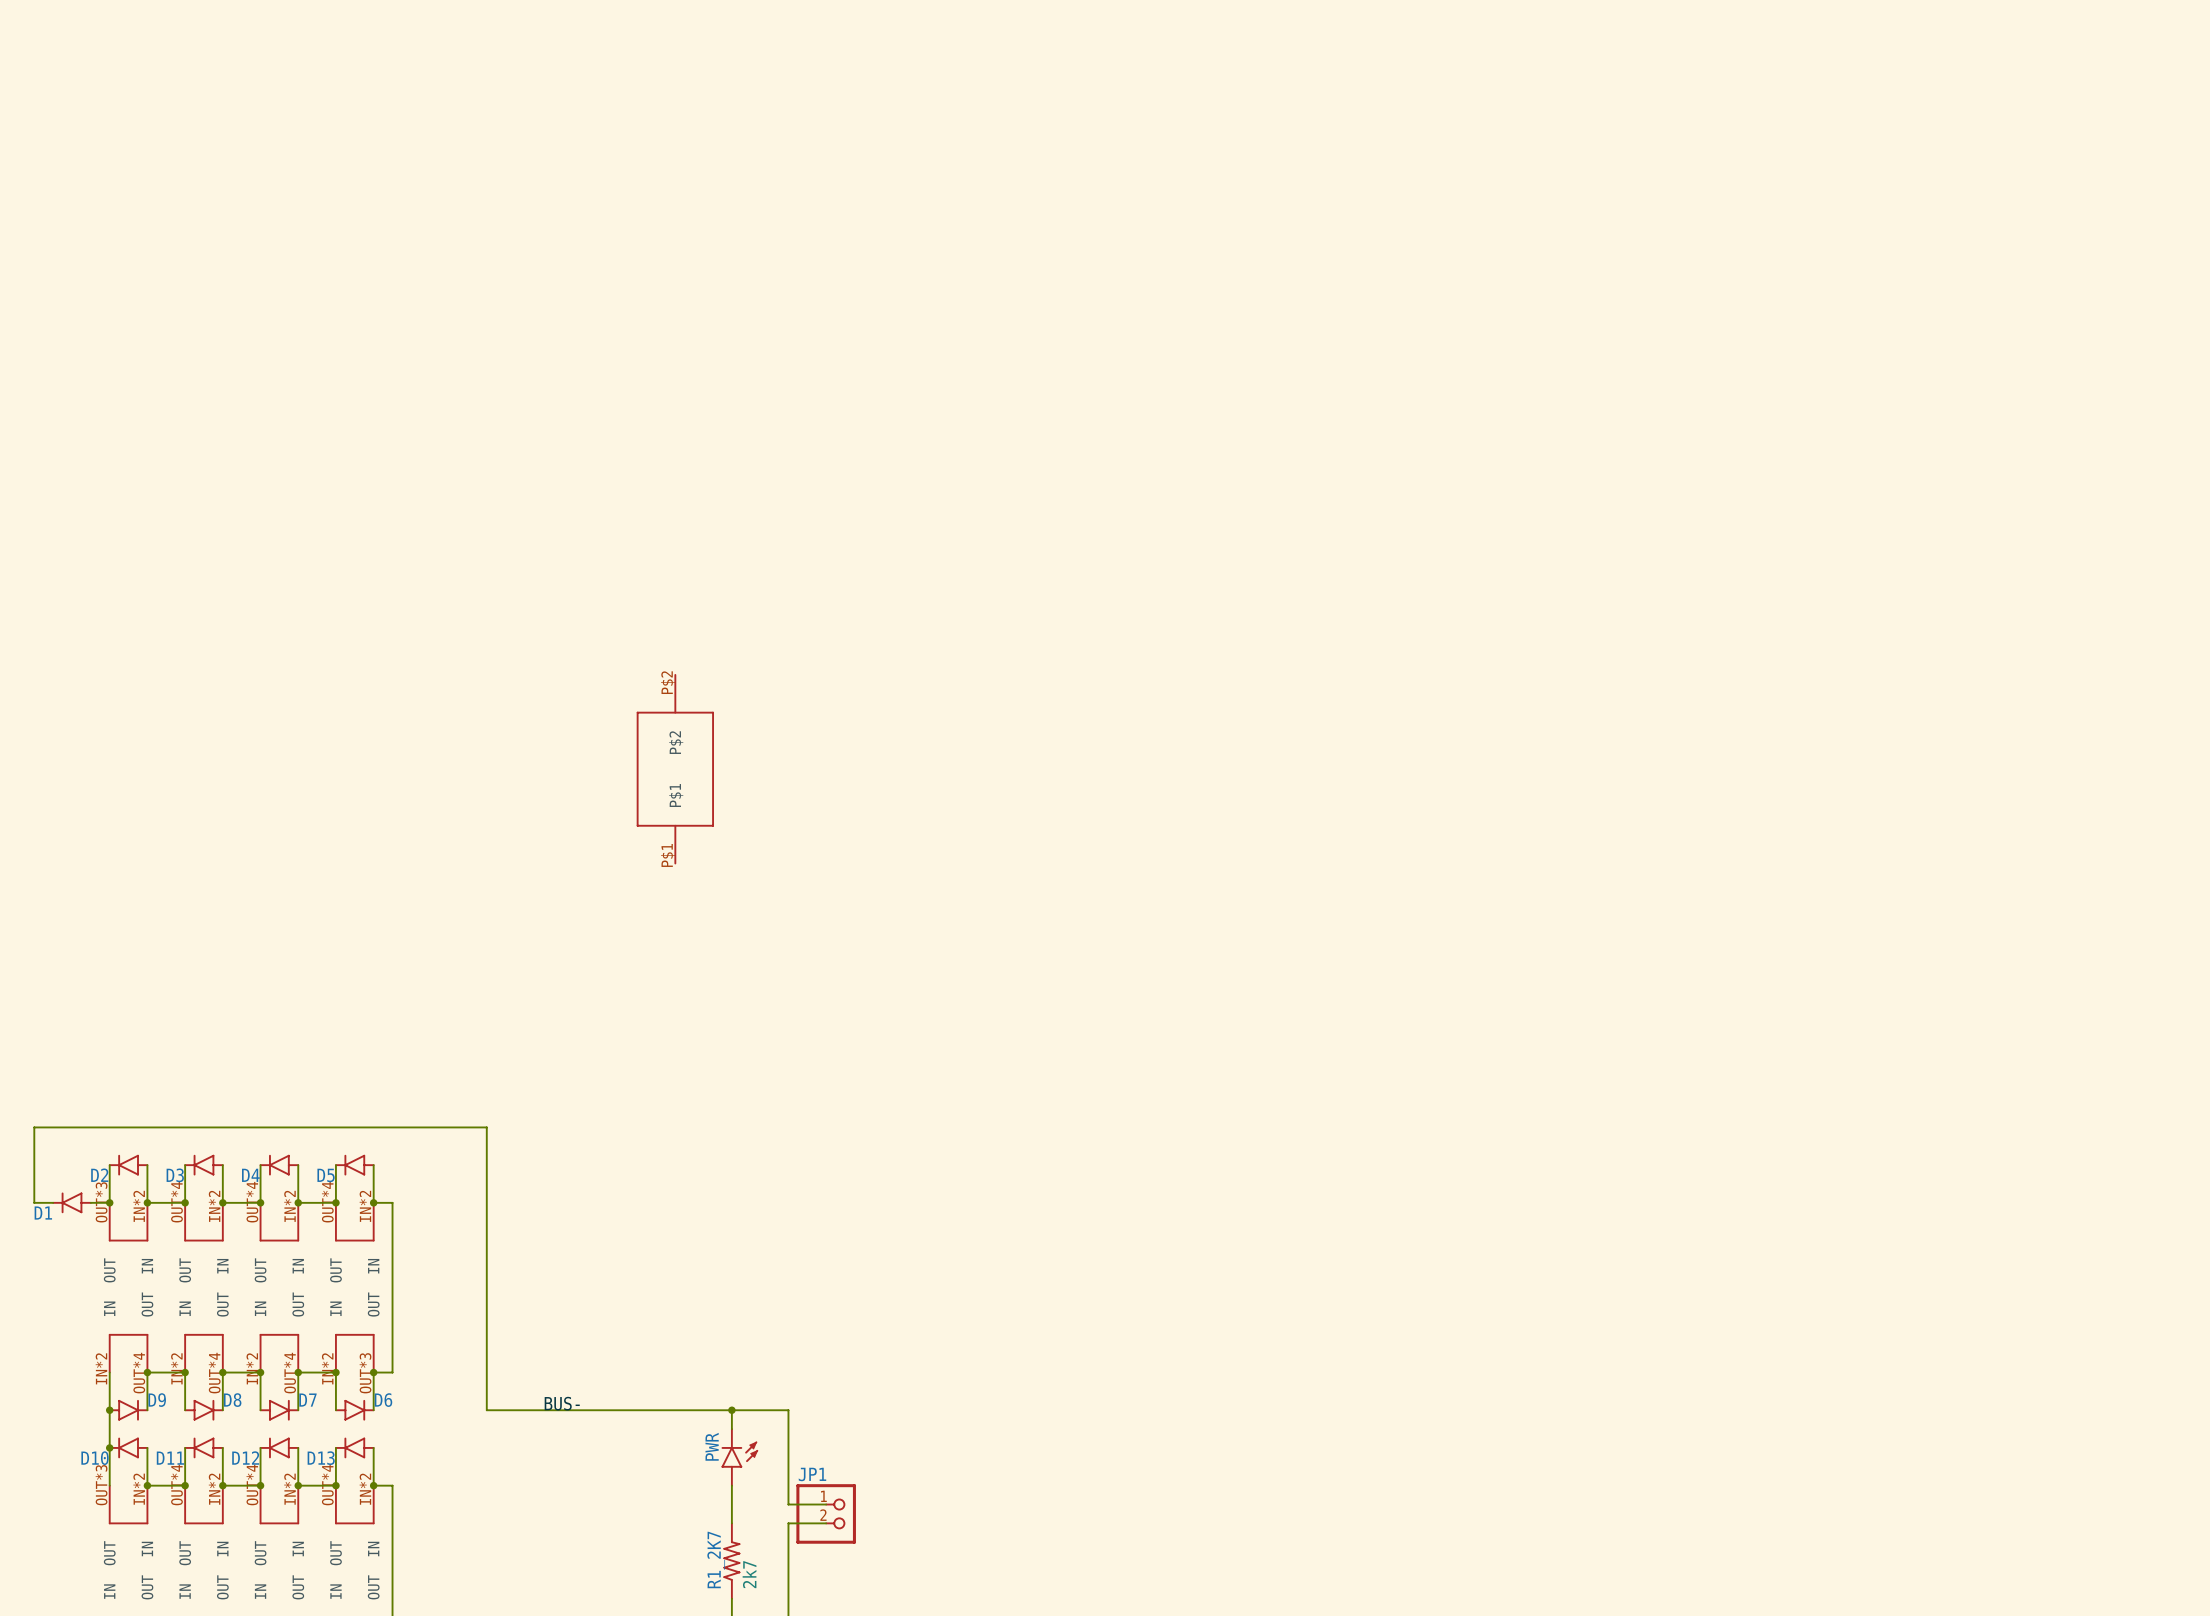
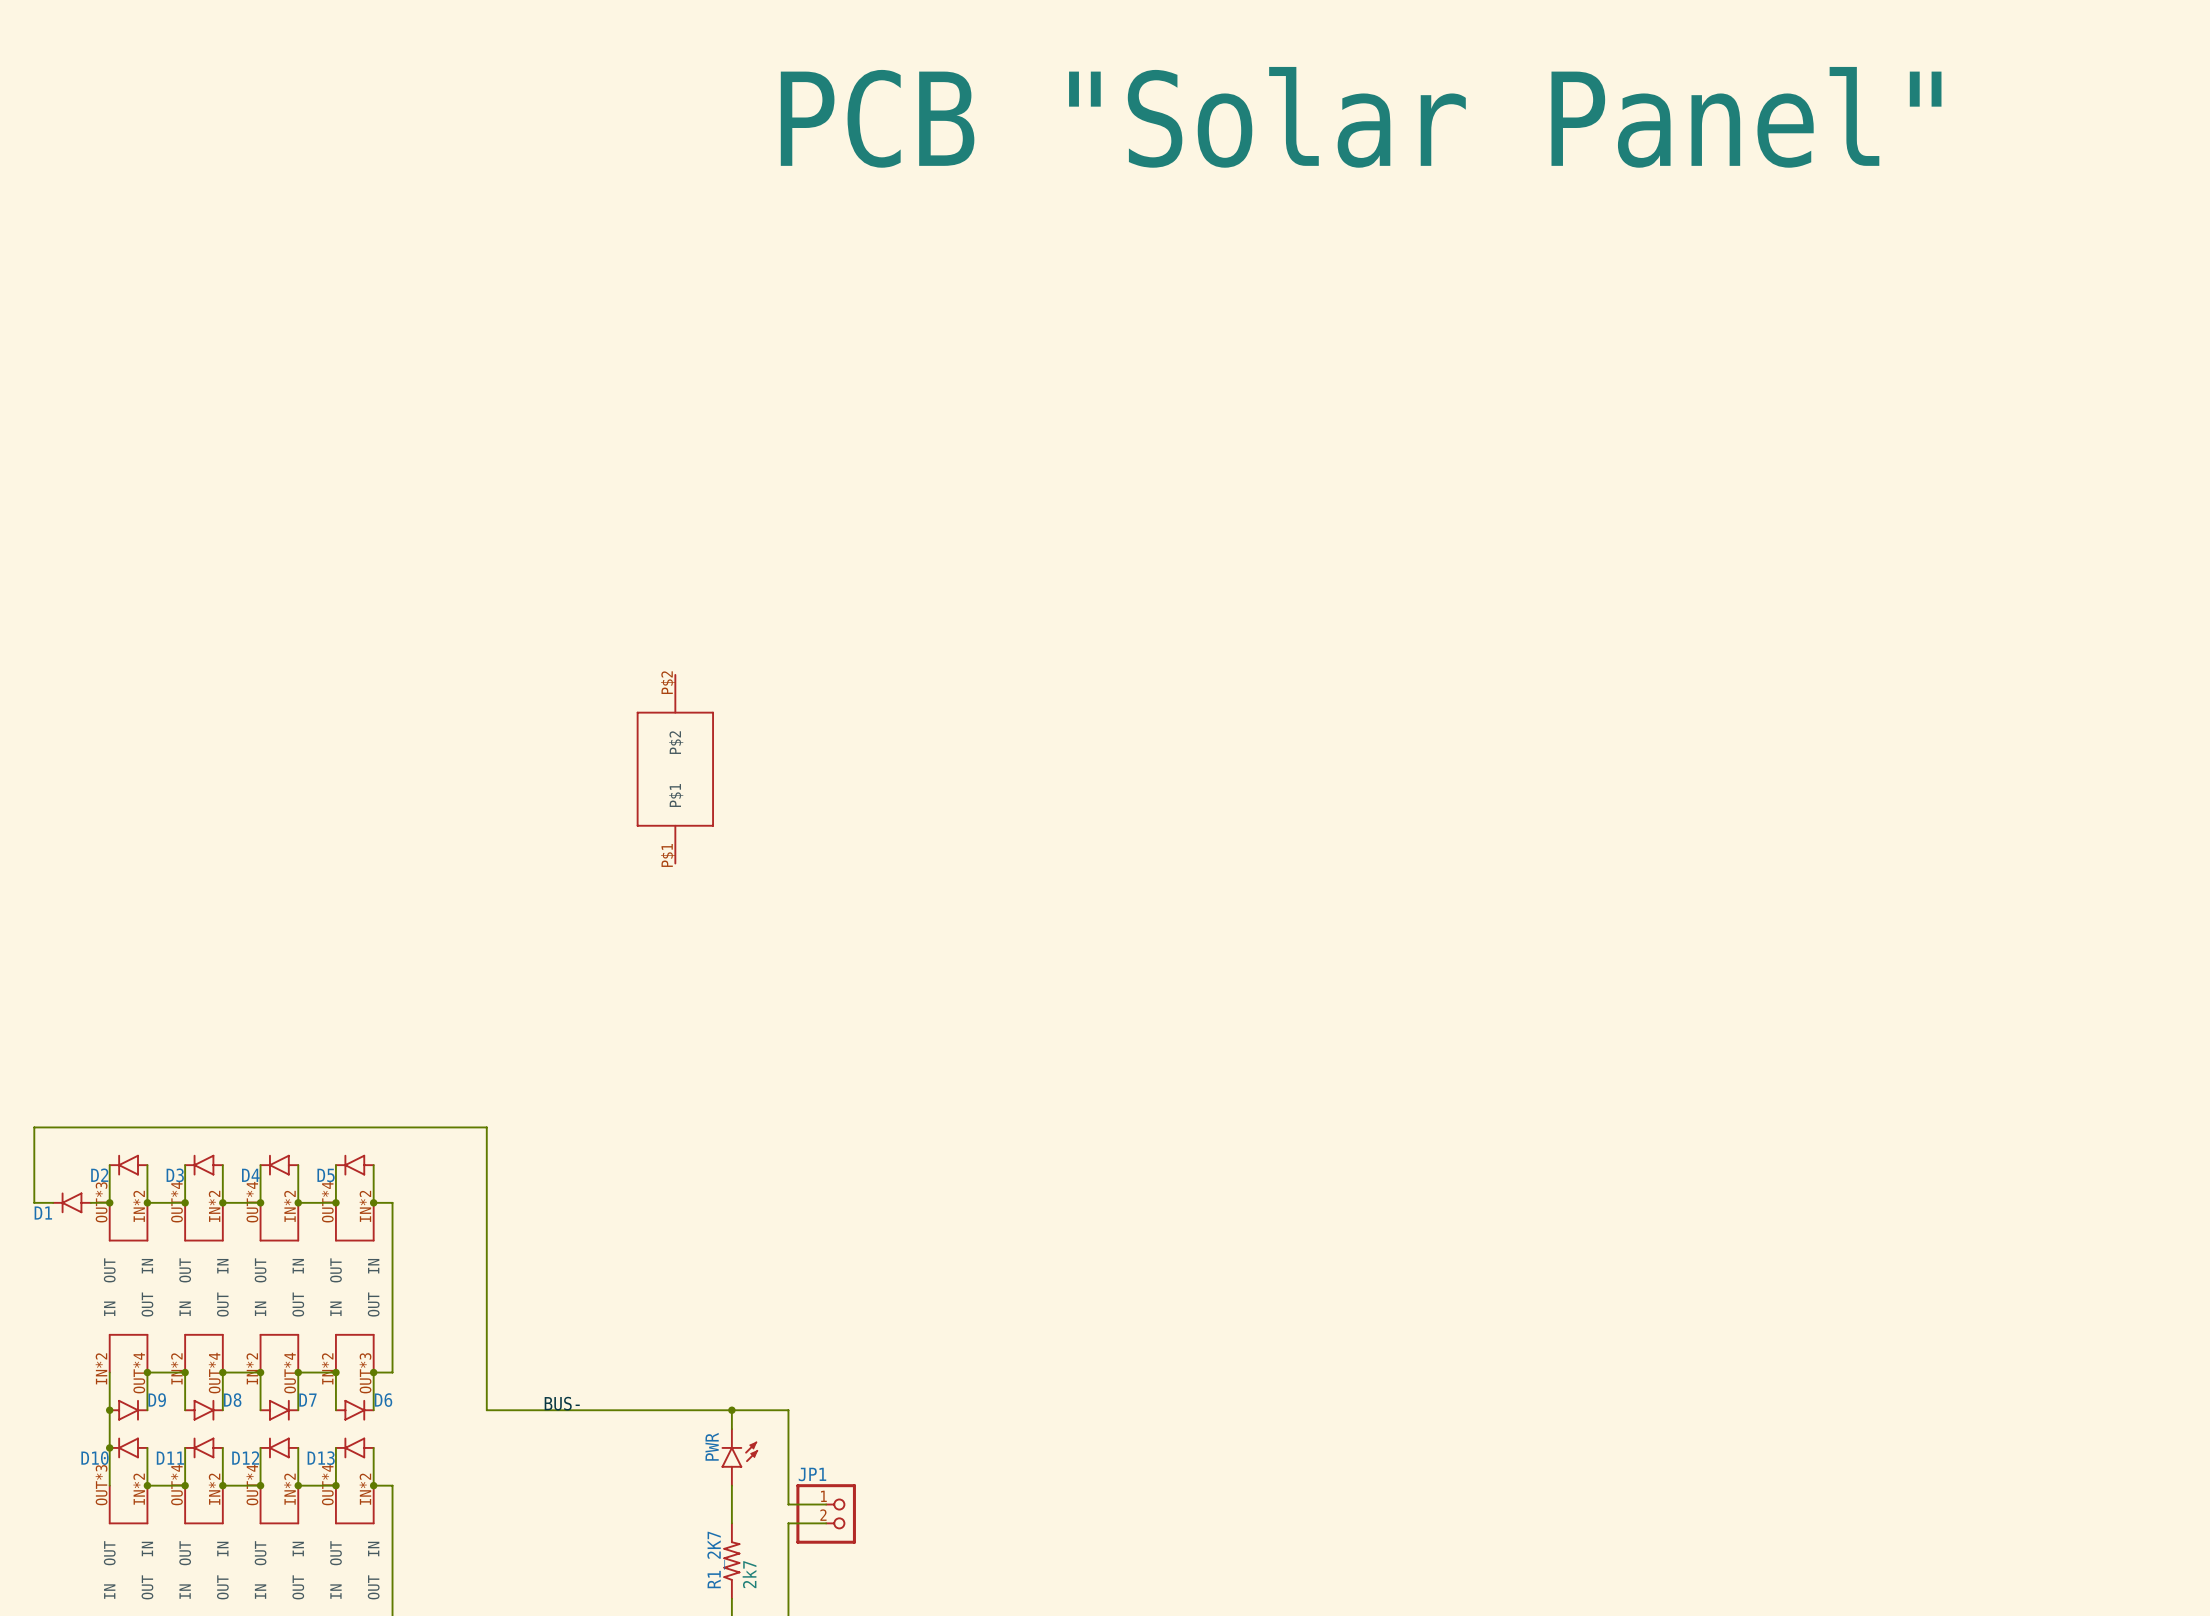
part: none -> PCB "Solar Panel" (1361, 117)

